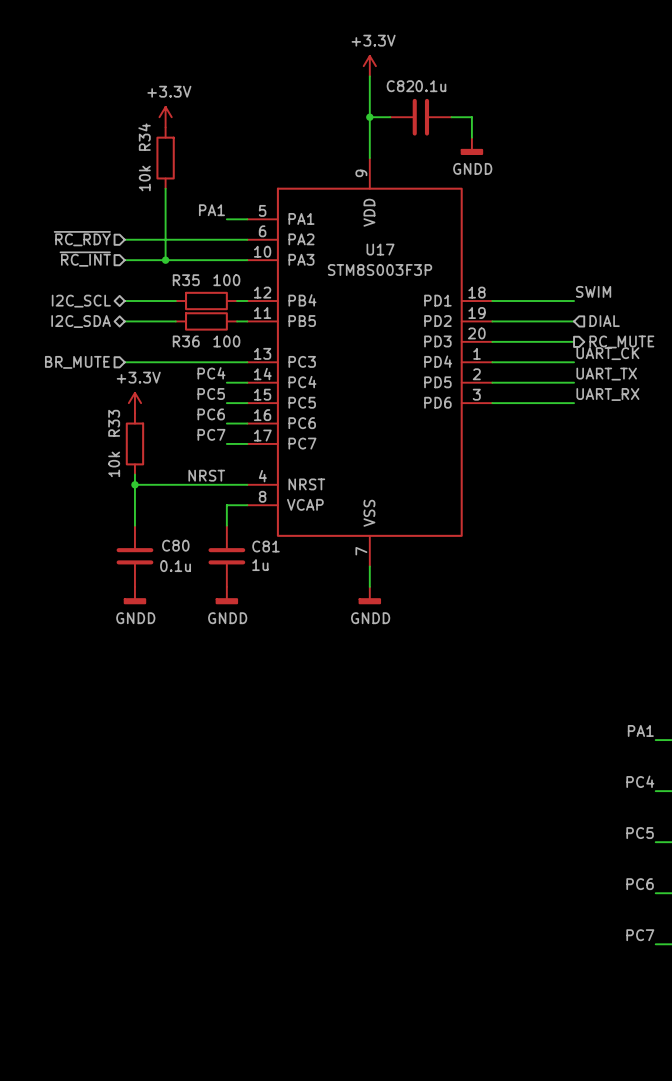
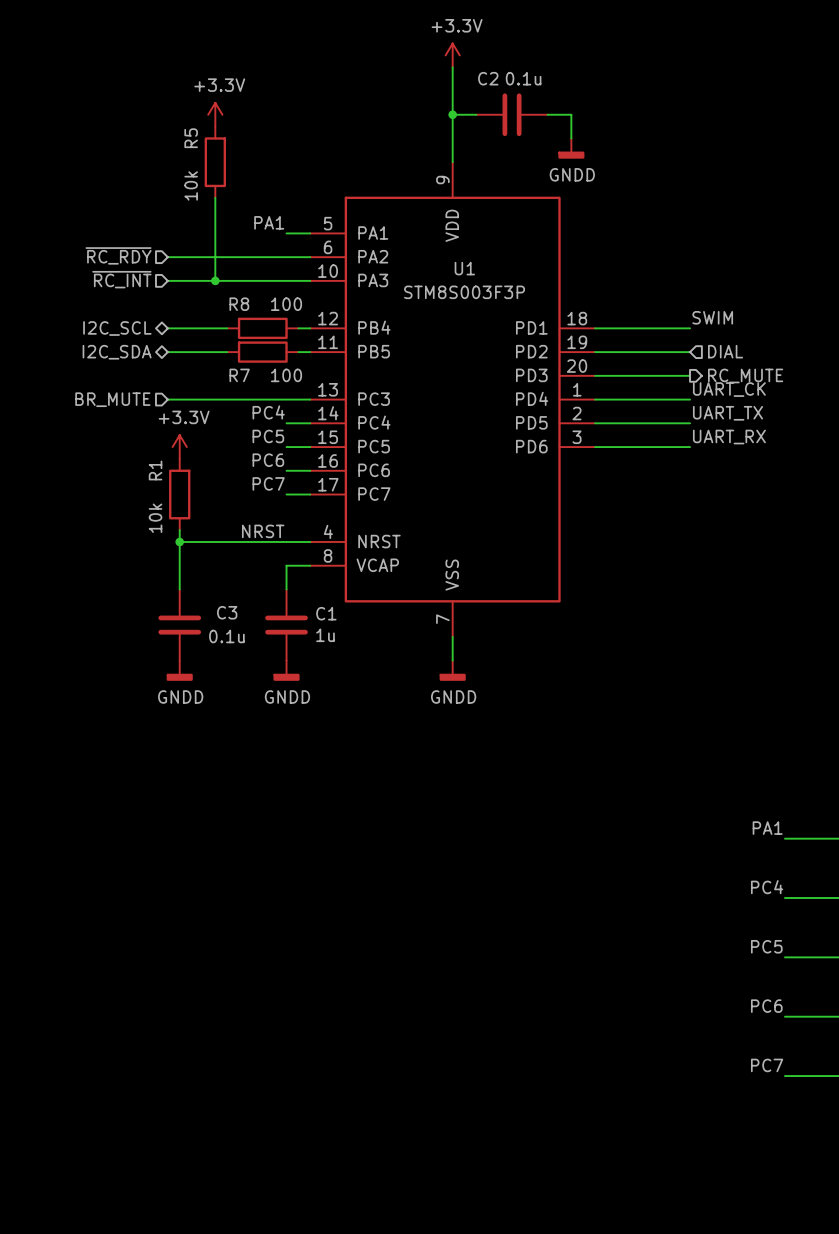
C82 name: C82 (400, 86) -> C2 (488, 78)
R34 name: R34 (144, 137) -> R5 (191, 138)
U17 name: U17 (380, 249) -> U1 (464, 268)
R35 name: R35 (186, 280) -> R8 (239, 304)
R36 name: R36 (186, 341) -> R7 (239, 375)
R33 name: R33 (114, 423) -> R1 (155, 470)
C80 name: C80 (175, 545) -> C3 (227, 612)
C81 name: C81 (265, 546) -> C1 (326, 613)

